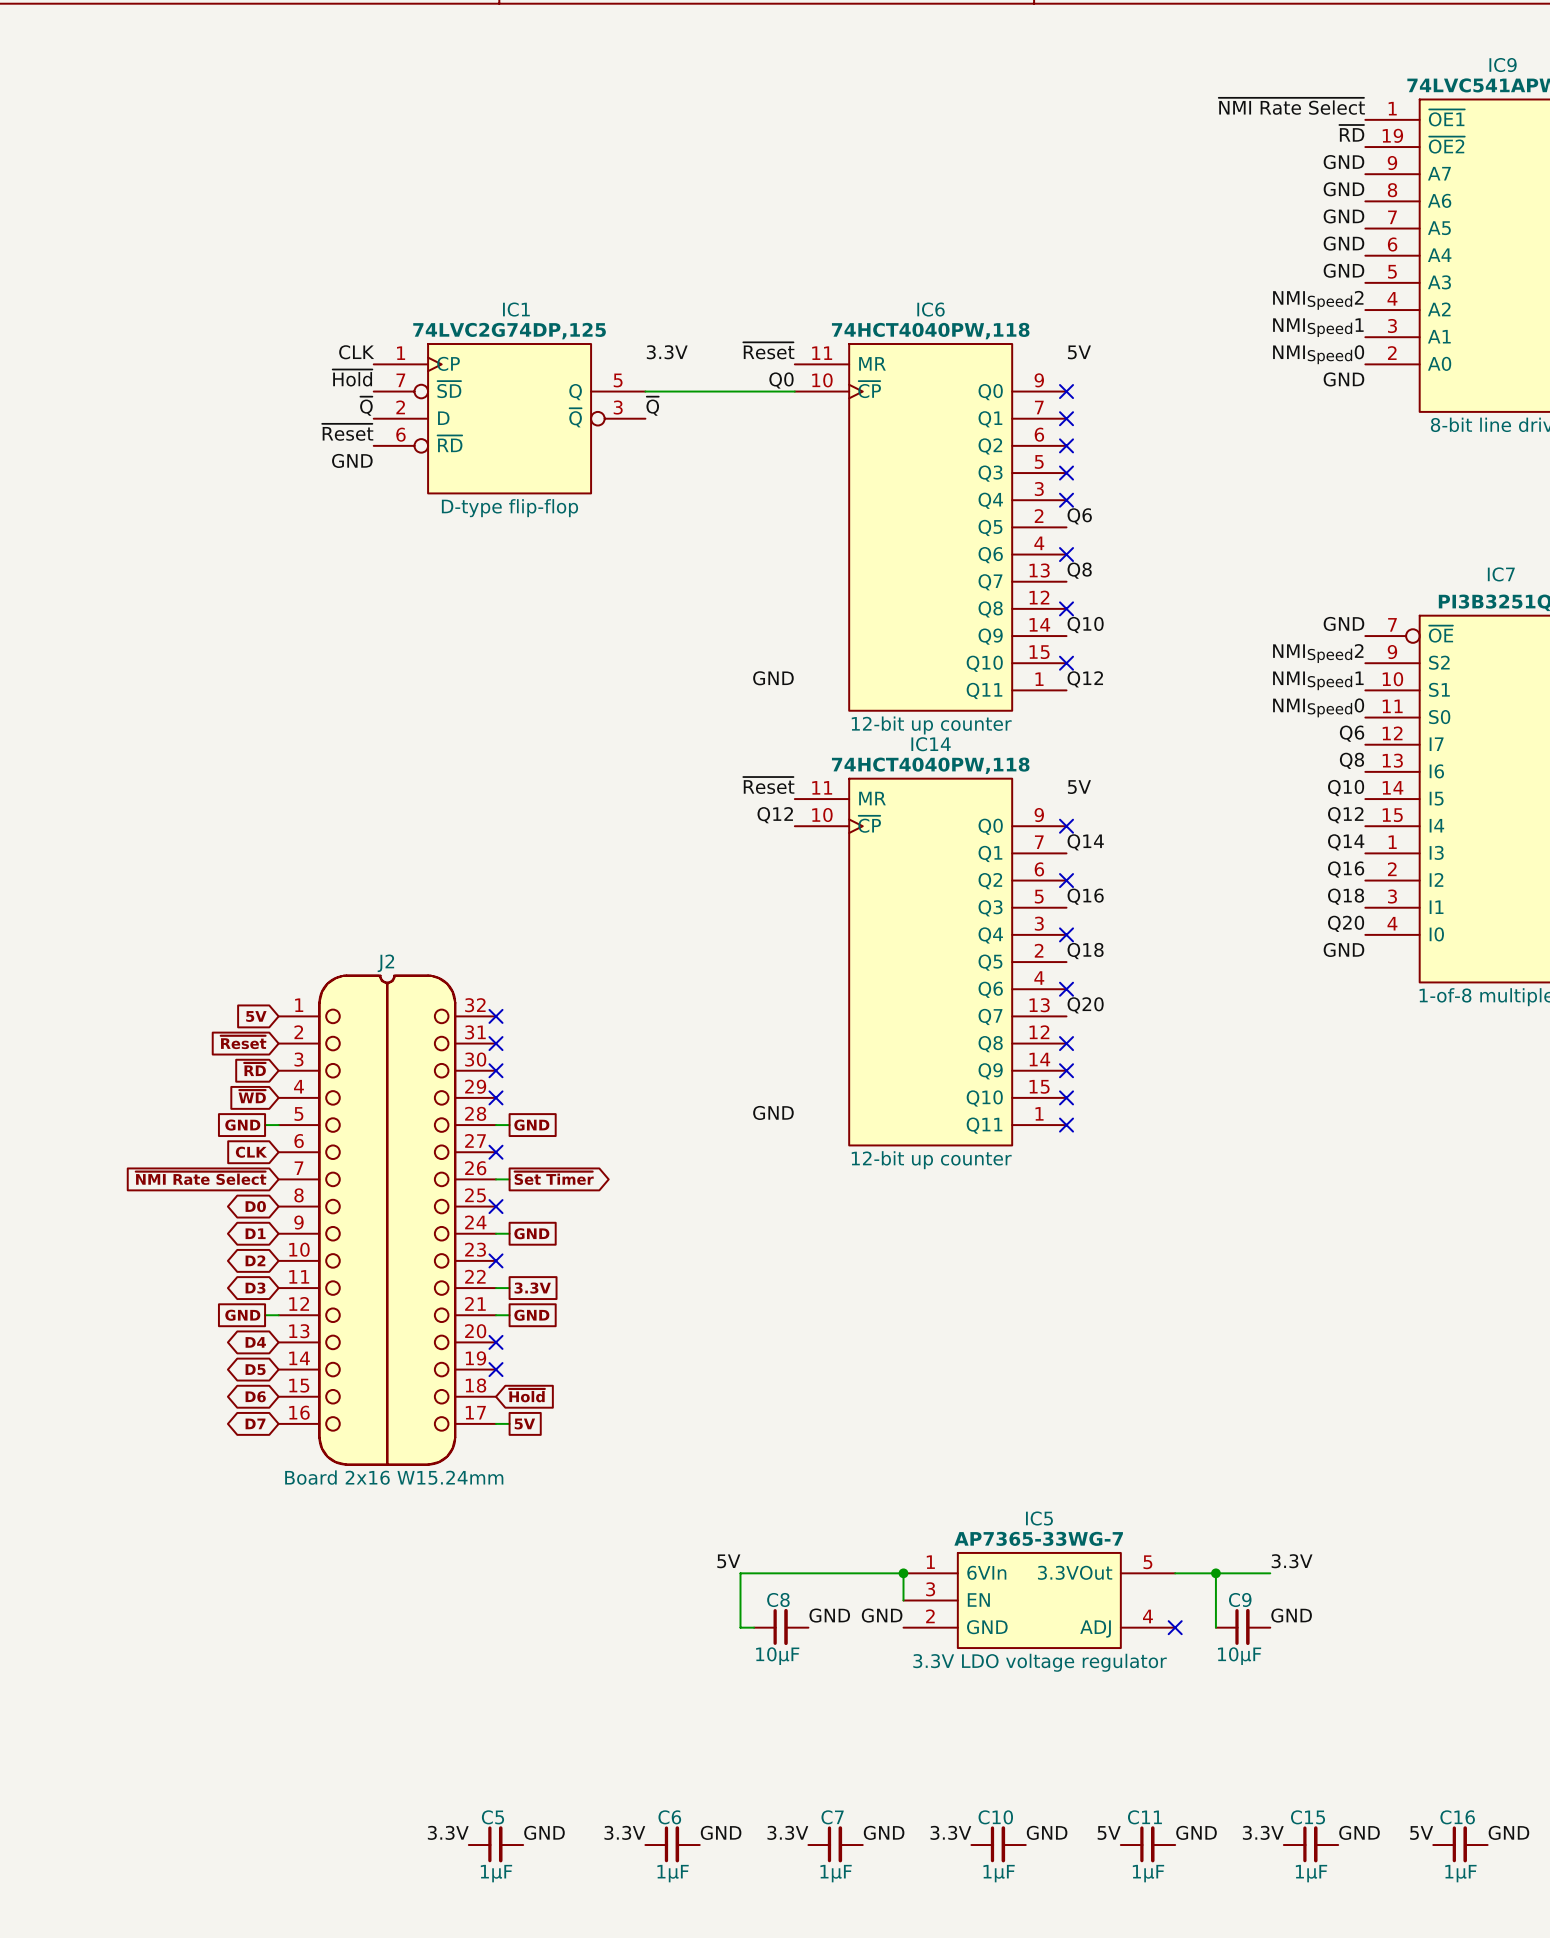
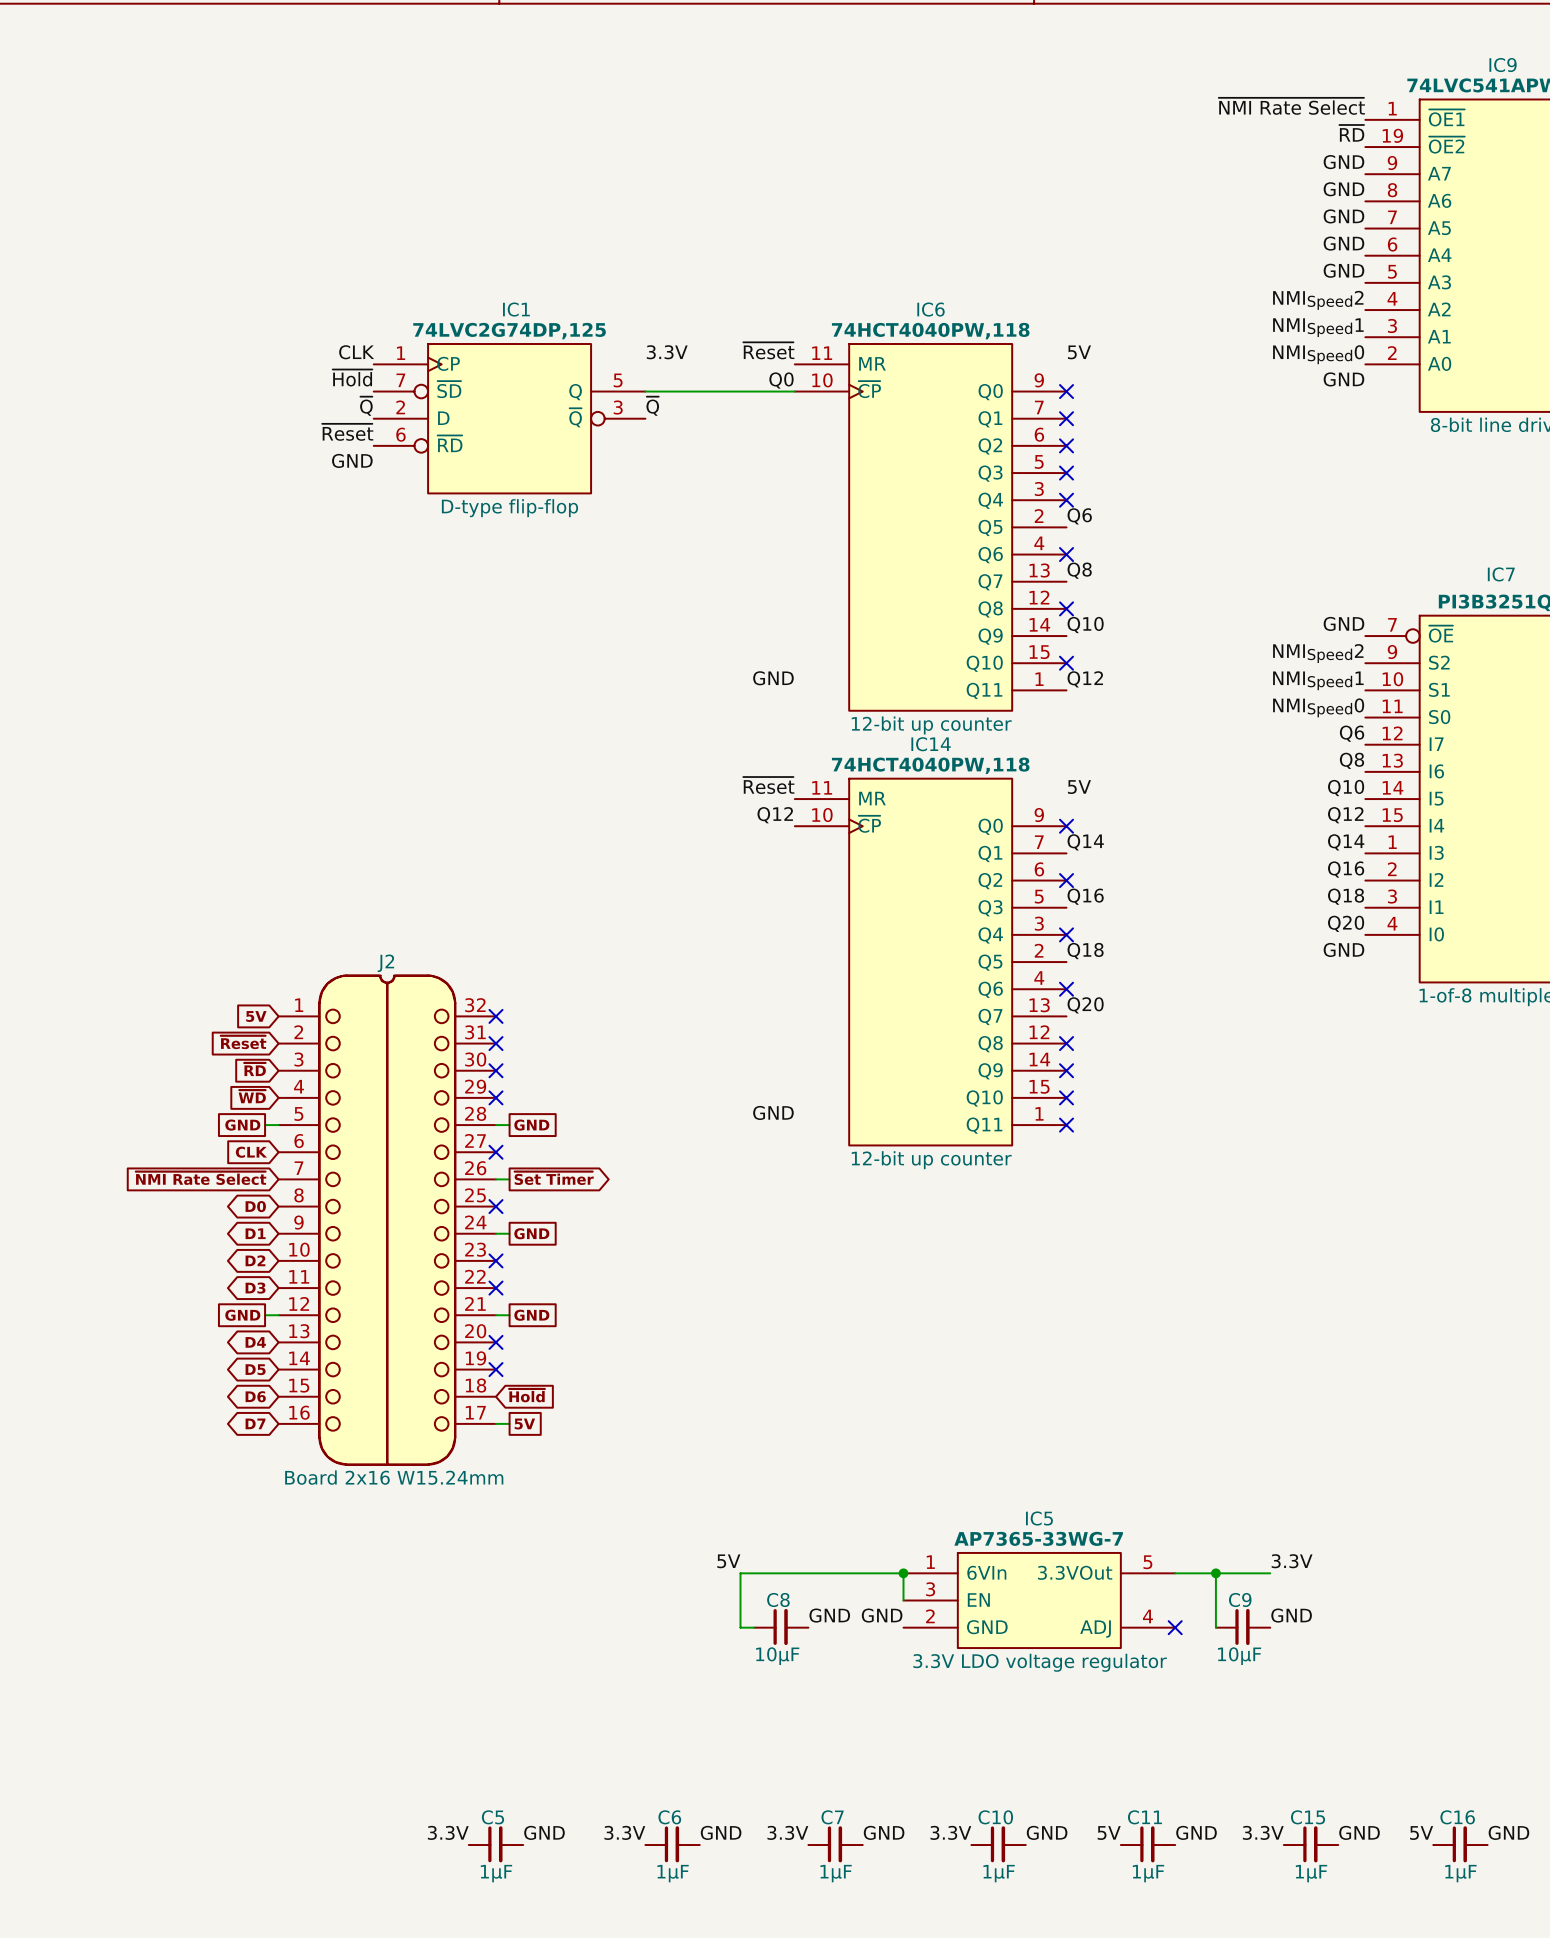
wire: (495, 1288) (509, 1288) -> none
no-connect mark: none -> (495, 1288)
global label: 3.3V (532, 1288) -> none

